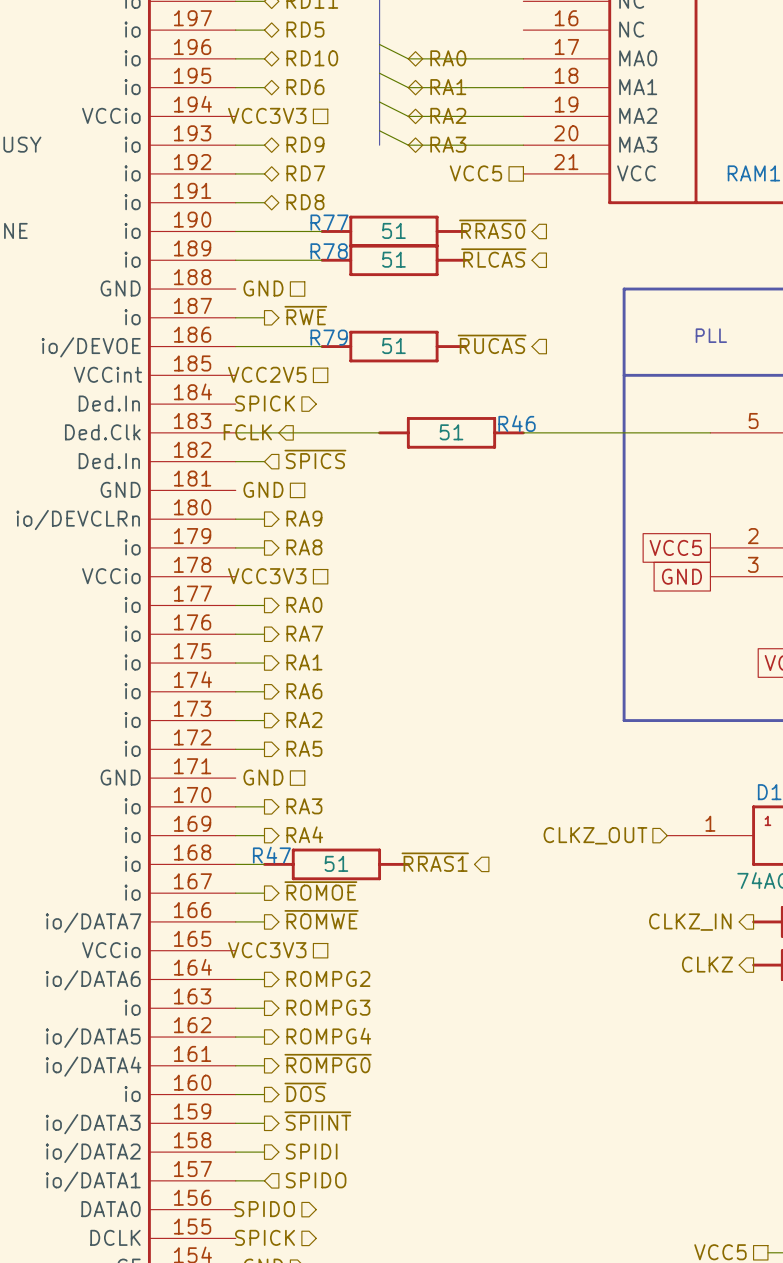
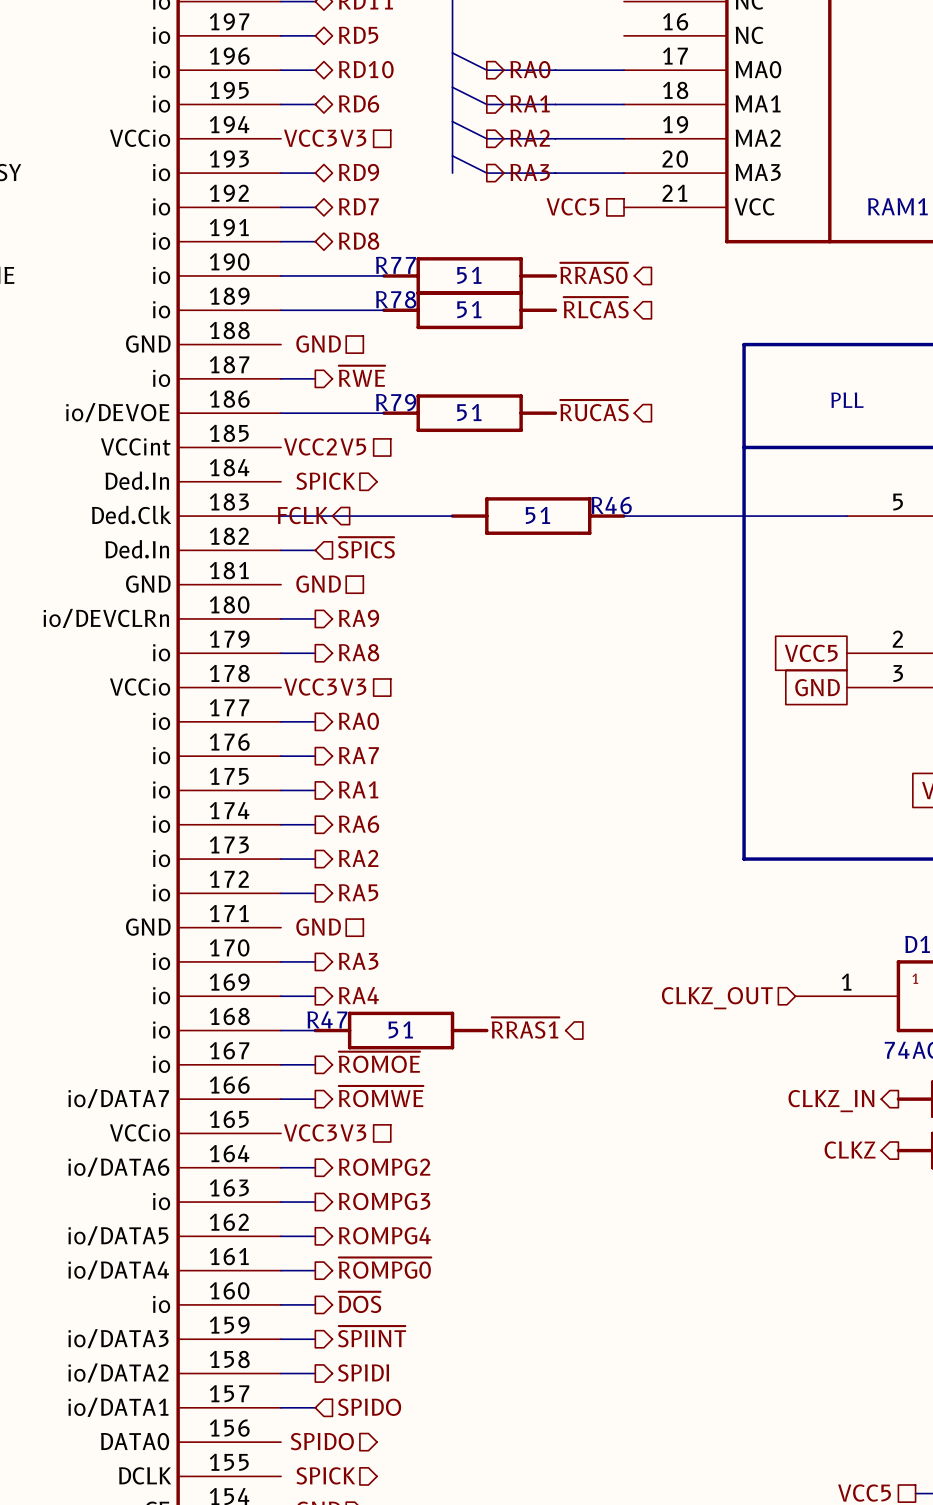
hierarchical label shape: bidirectional (448, 58) -> output (530, 69)
hierarchical label shape: bidirectional (448, 87) -> output (530, 103)
hierarchical label shape: bidirectional (448, 115) -> output (530, 138)
hierarchical label shape: bidirectional (448, 144) -> output (530, 172)

